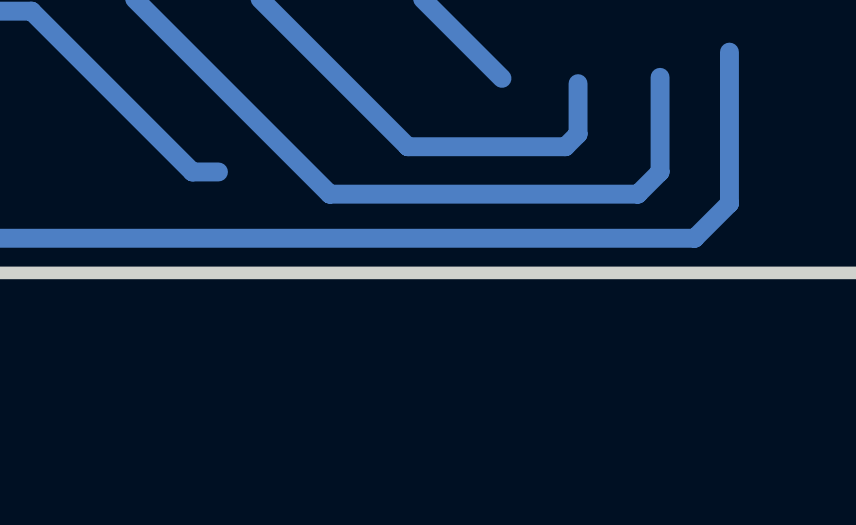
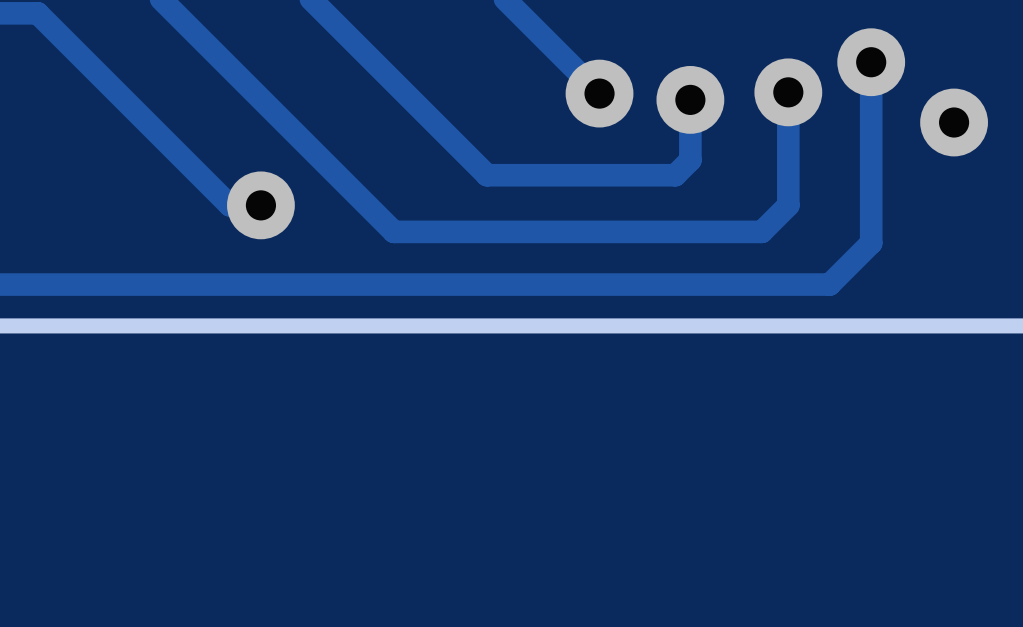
via: none -> (871, 62)
via: none -> (788, 92)
via: none -> (599, 93)
via: none -> (690, 99)
via: none -> (954, 122)
via: none -> (260, 205)

